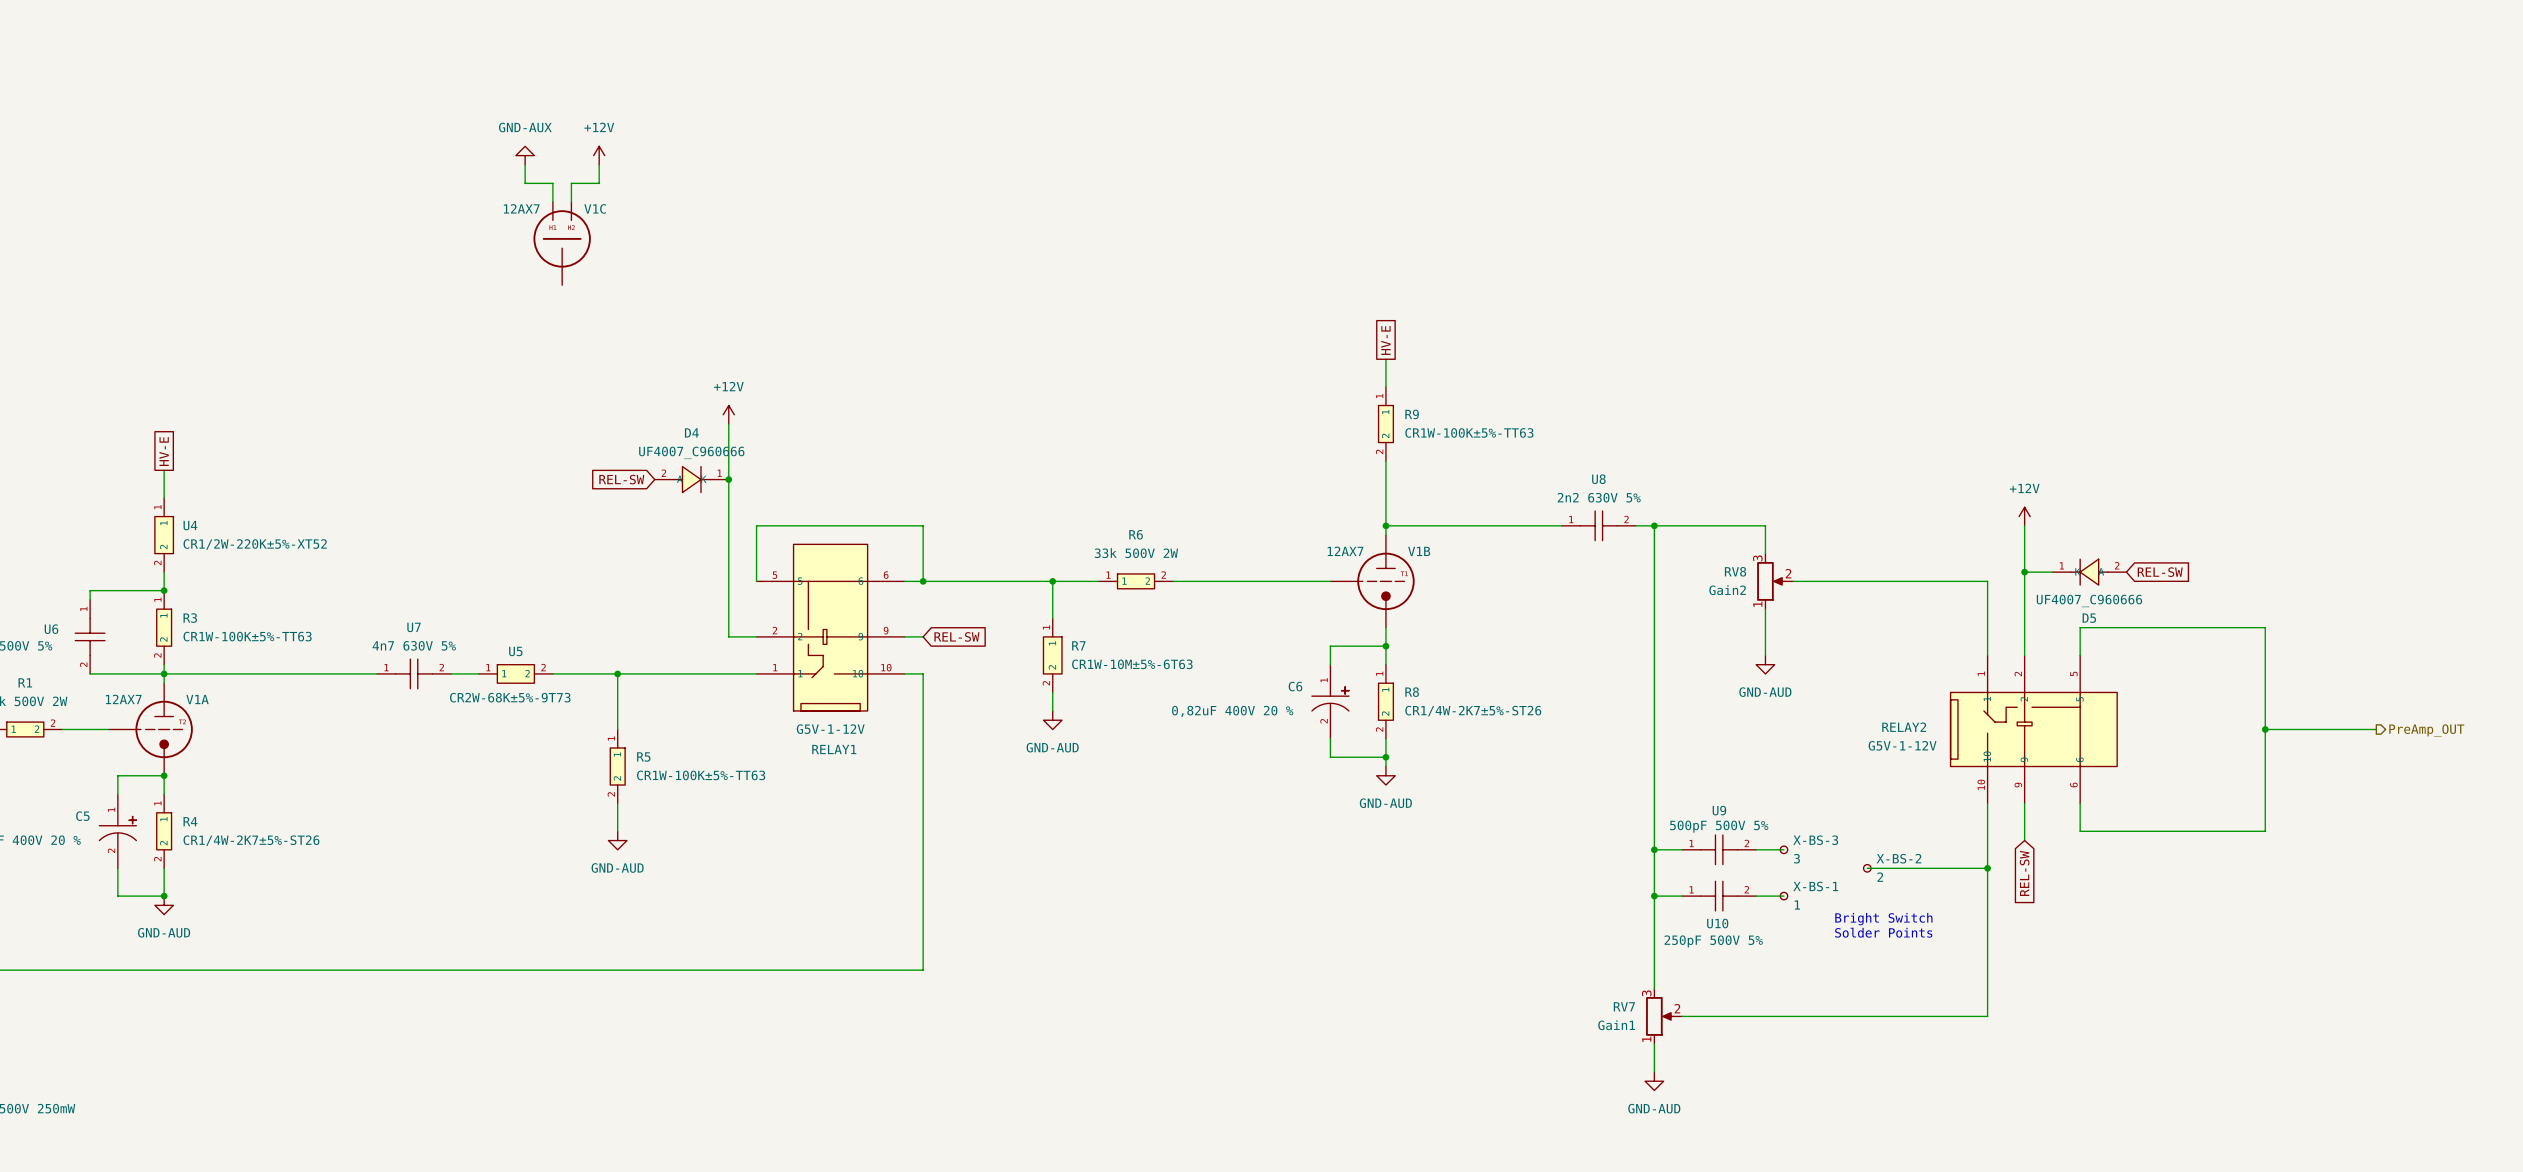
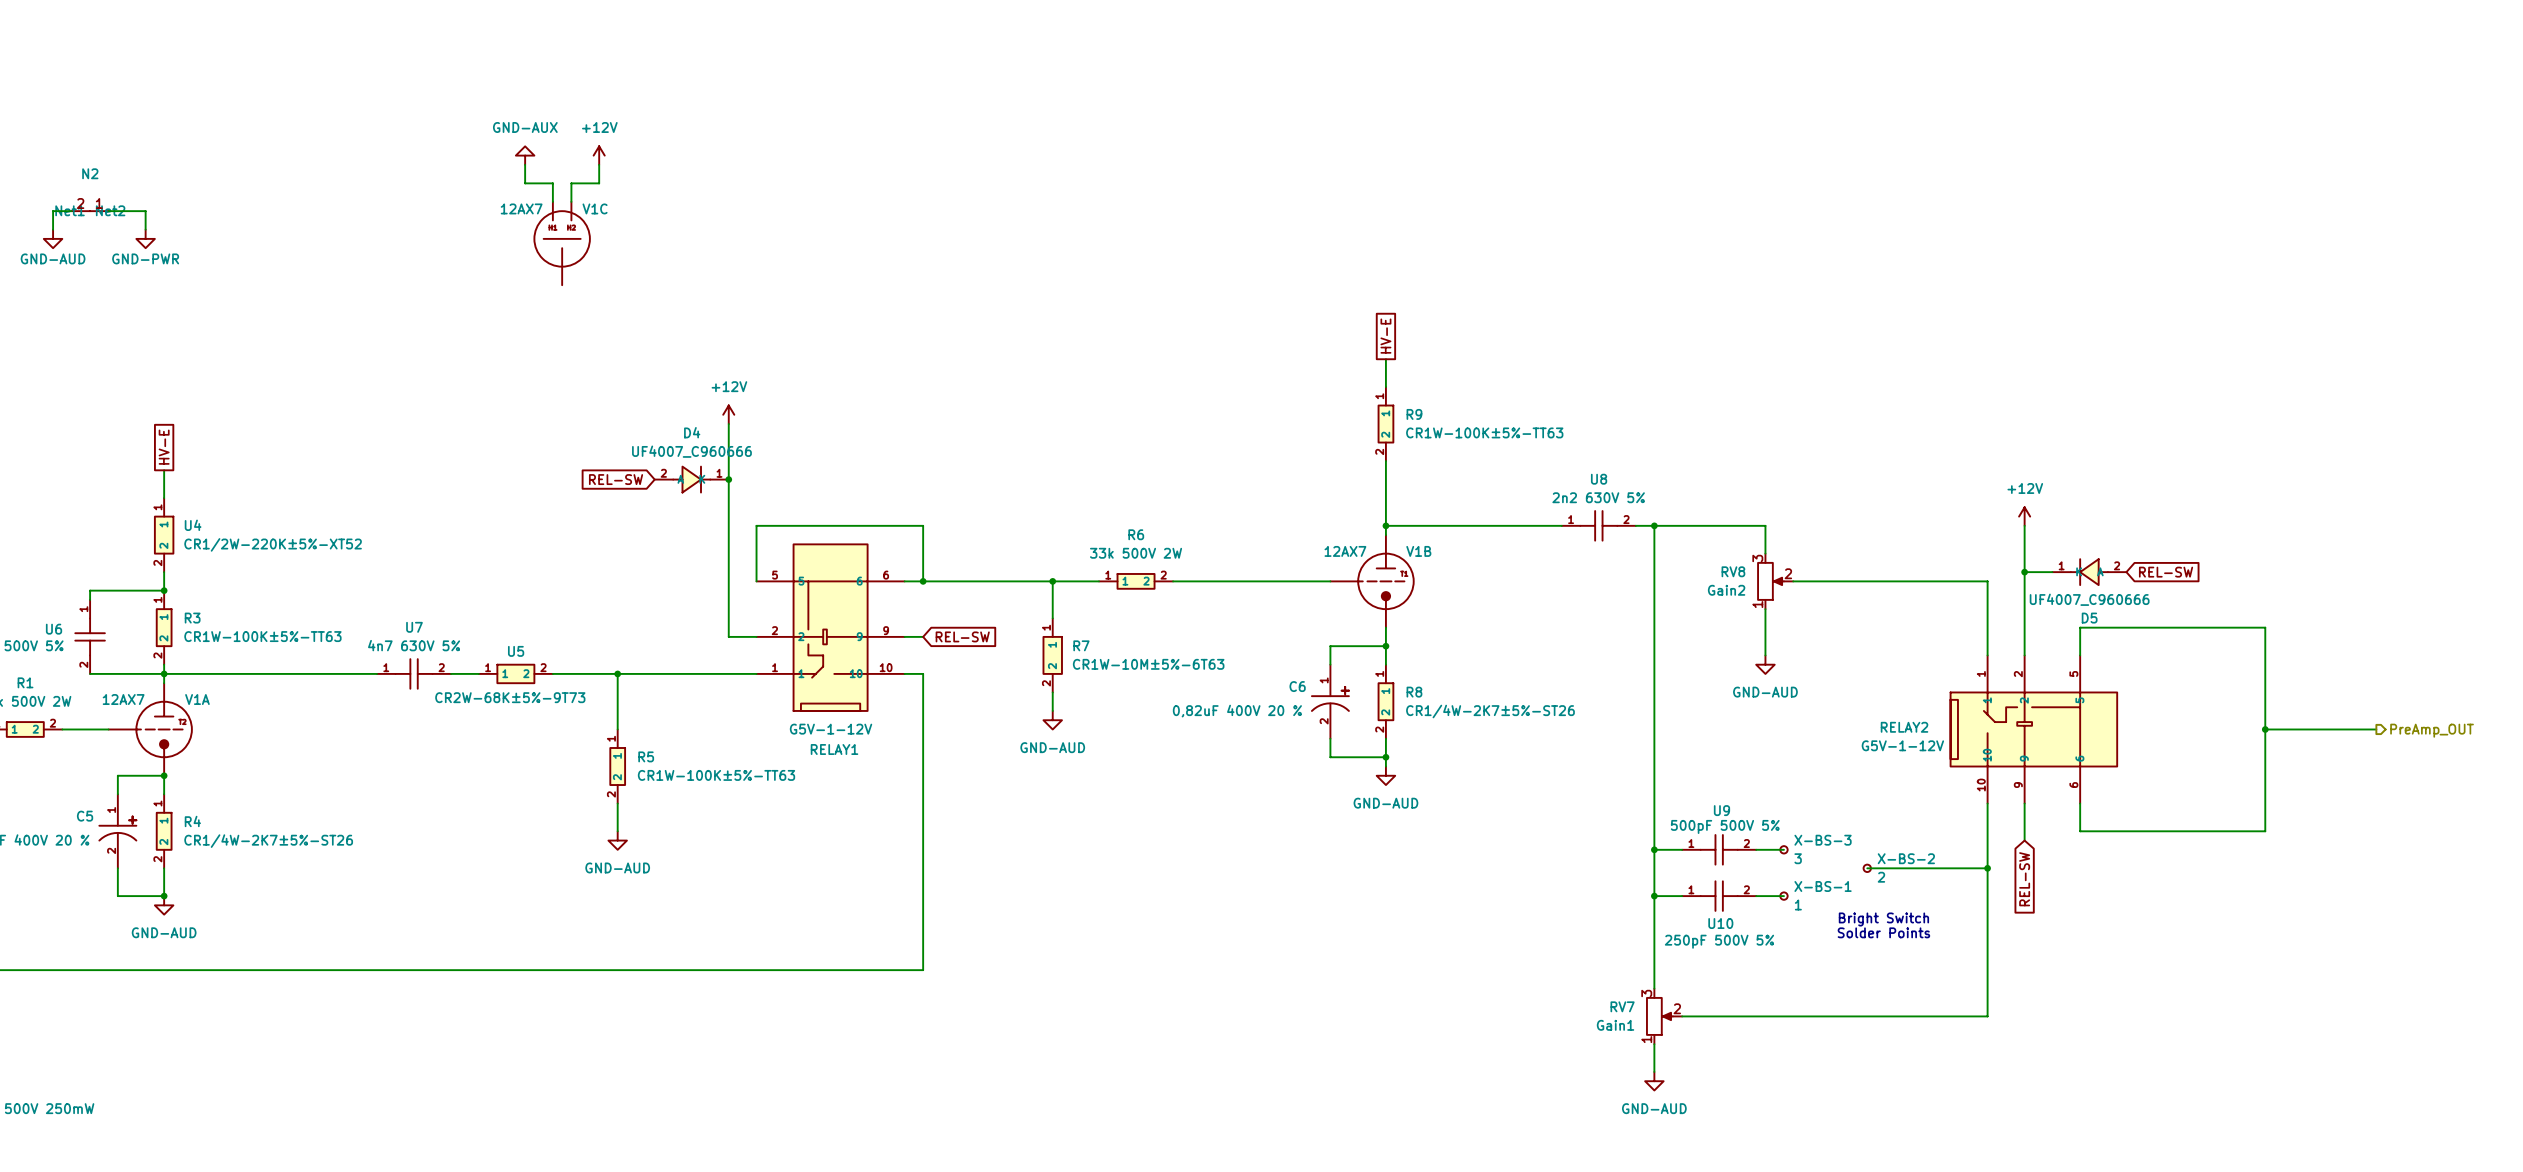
wire: none -> (71, 211) (53, 211) (53, 229)
N2: none -> (90, 211)
wire: none -> (108, 211) (145, 211) (145, 229)
power symbol: none -> GND-AUD (53, 238)
power symbol: none -> GND-PWR (145, 238)

